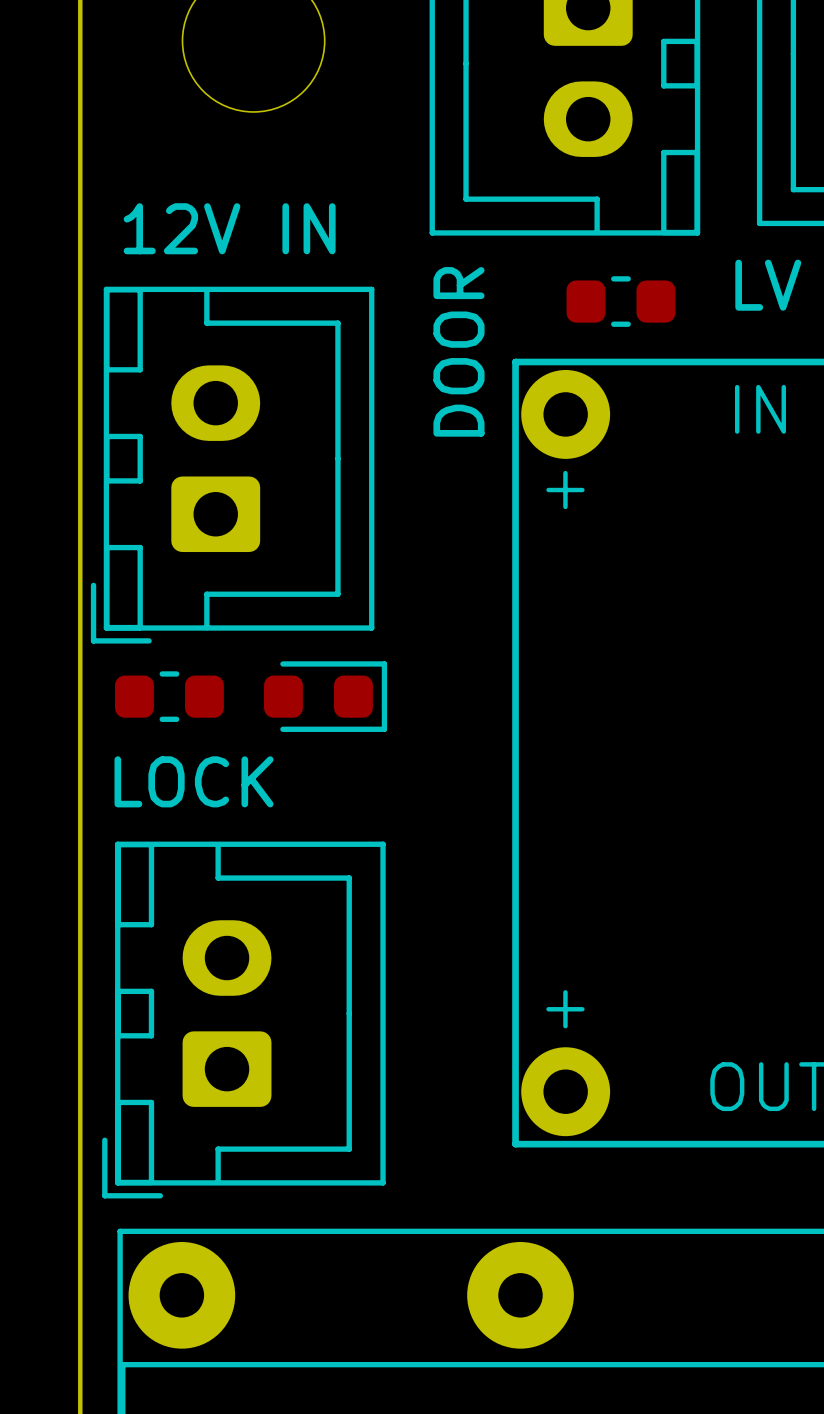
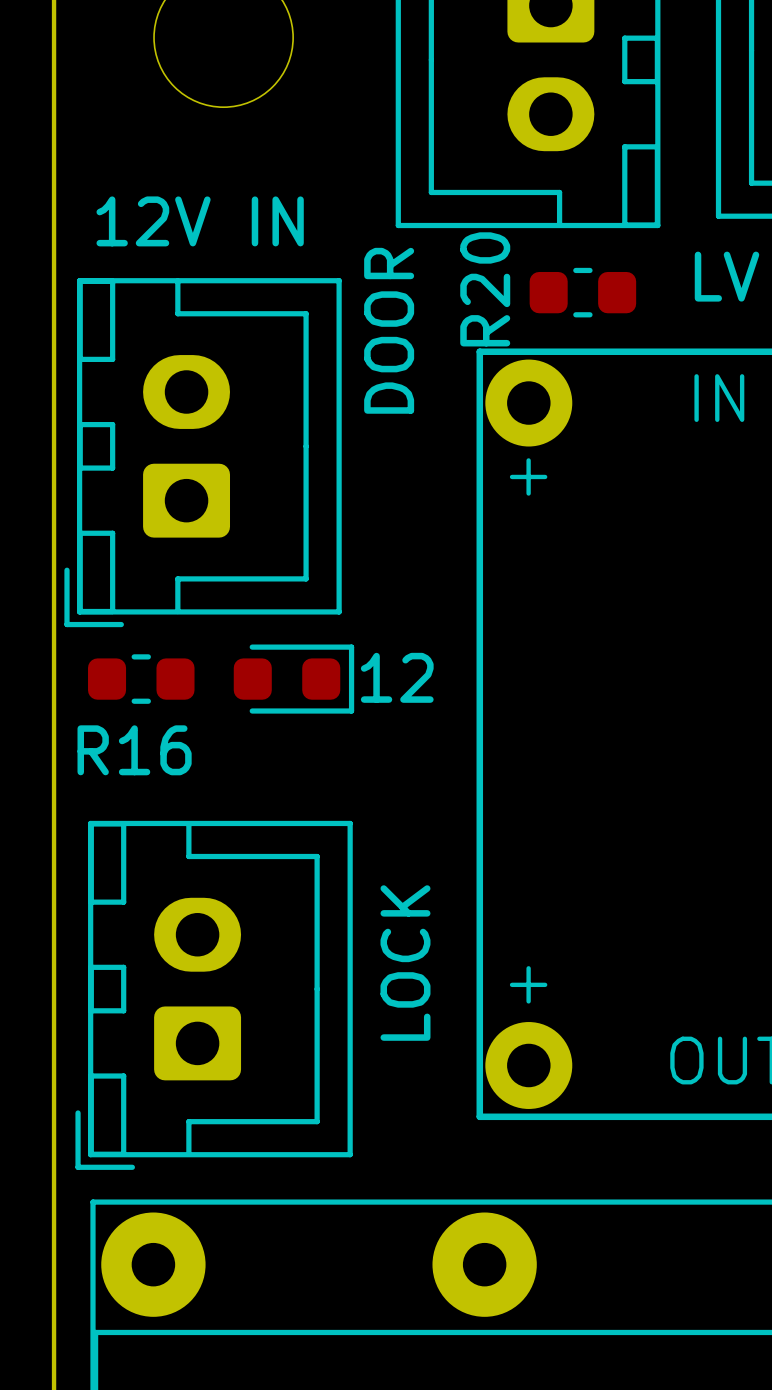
R20 name: none -> R20 (485, 289)
text position: DOOR (458, 351) -> DOOR (389, 330)
text: none -> 12 (397, 677)
R16 name: none -> R16 (134, 750)
text rotation: 0° (194, 781) -> 90° counterclockwise (405, 963)
text position: LOCK (194, 781) -> LOCK (405, 963)

